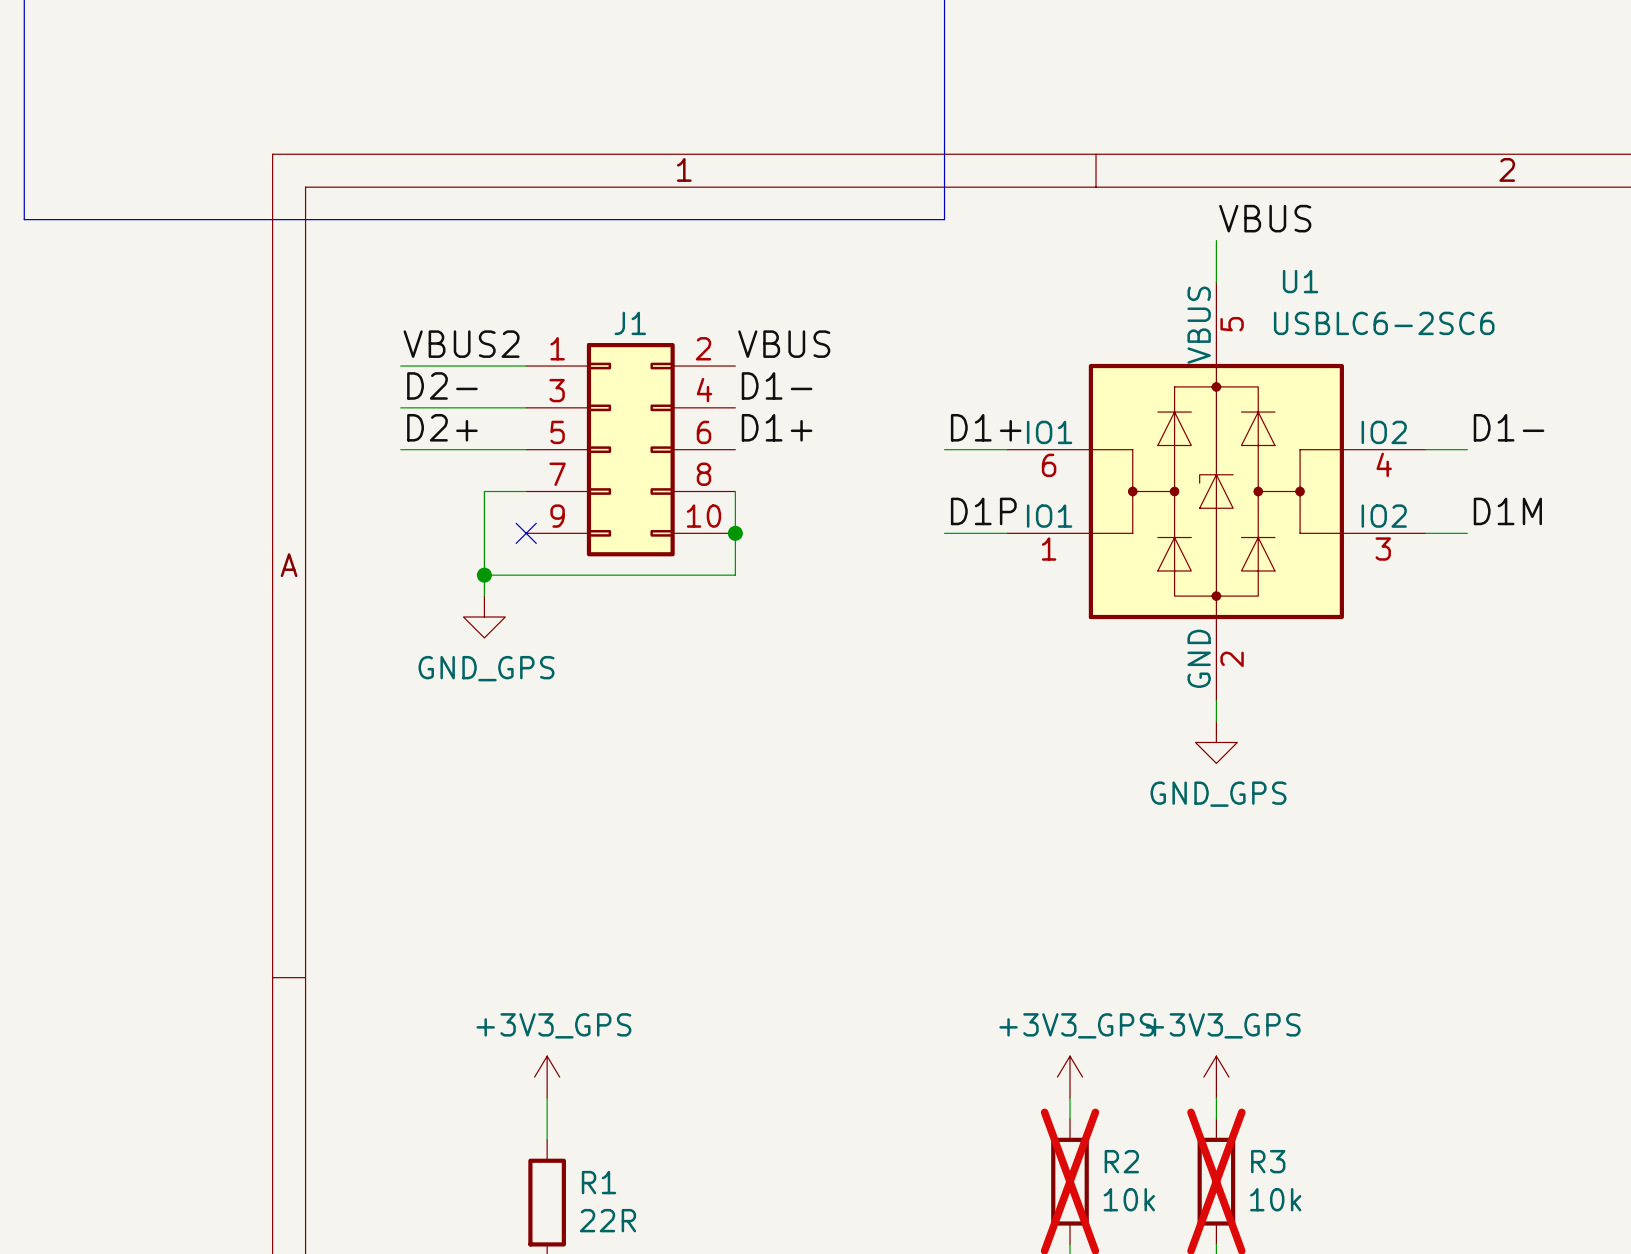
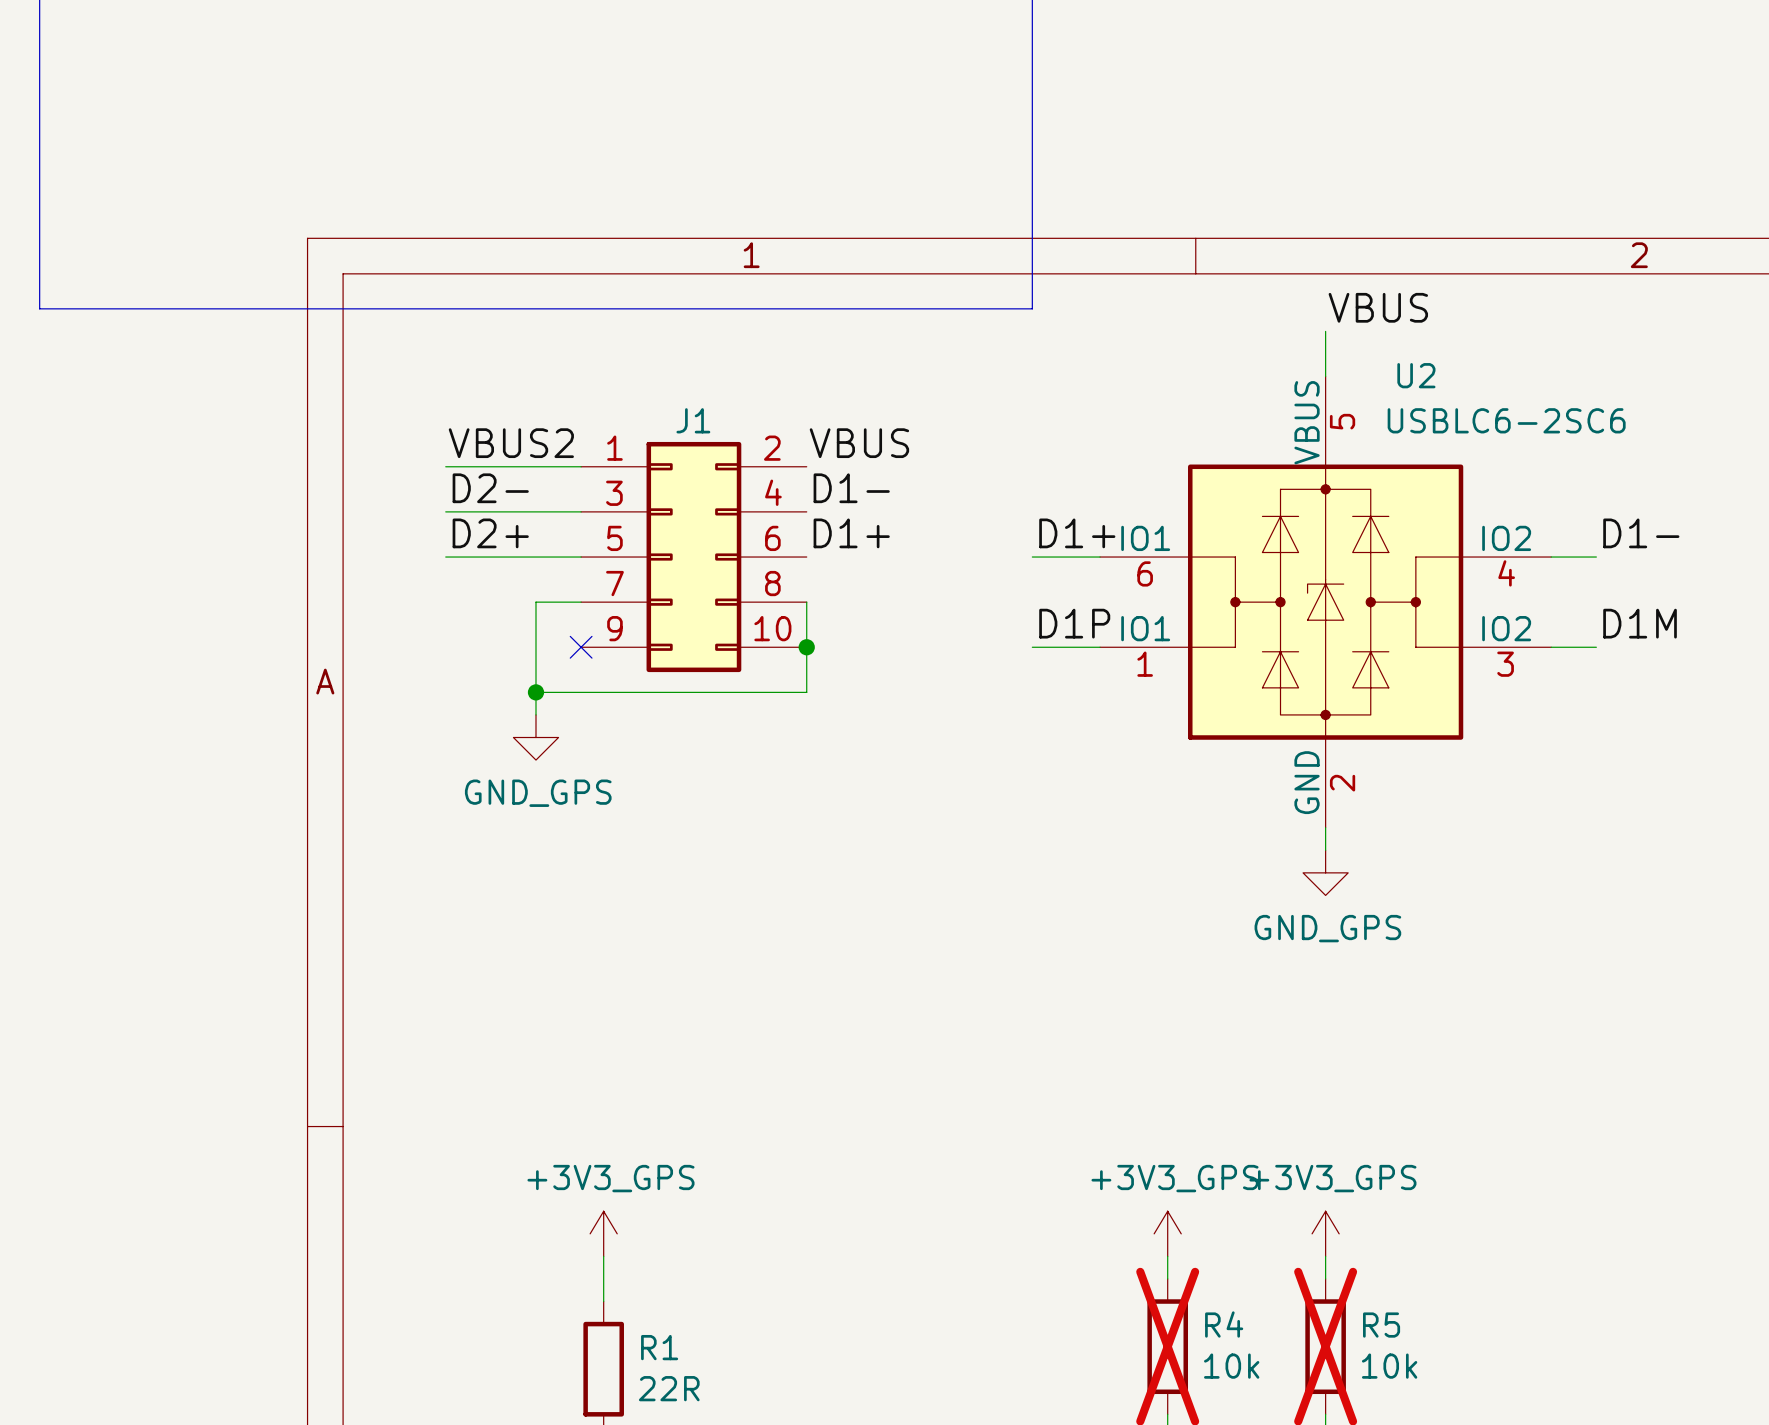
U1 name: U1 (1300, 281) -> U2 (1416, 375)
R2 name: R2 (1121, 1161) -> R4 (1224, 1324)
R3 name: R3 (1268, 1161) -> R5 (1381, 1325)

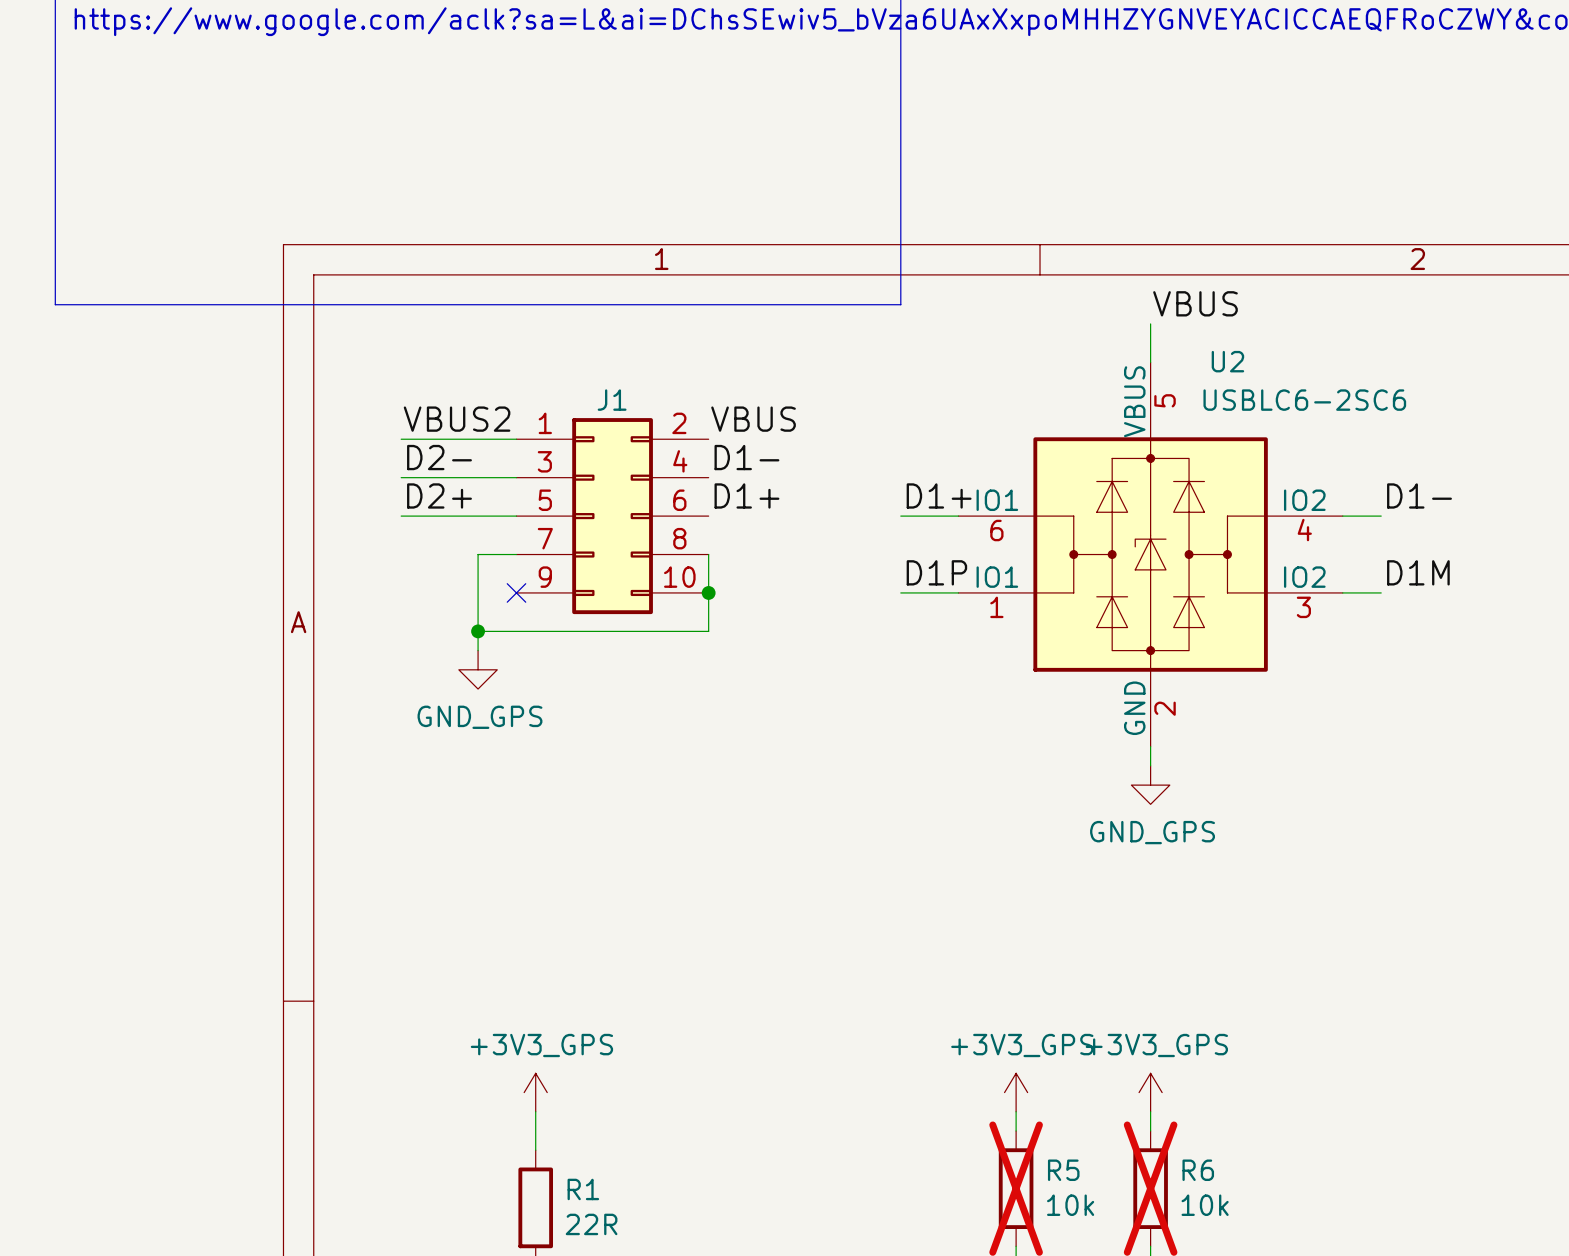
R4 name: R4 (1224, 1324) -> R5 (1063, 1170)
R5 name: R5 (1381, 1325) -> R6 (1198, 1170)

